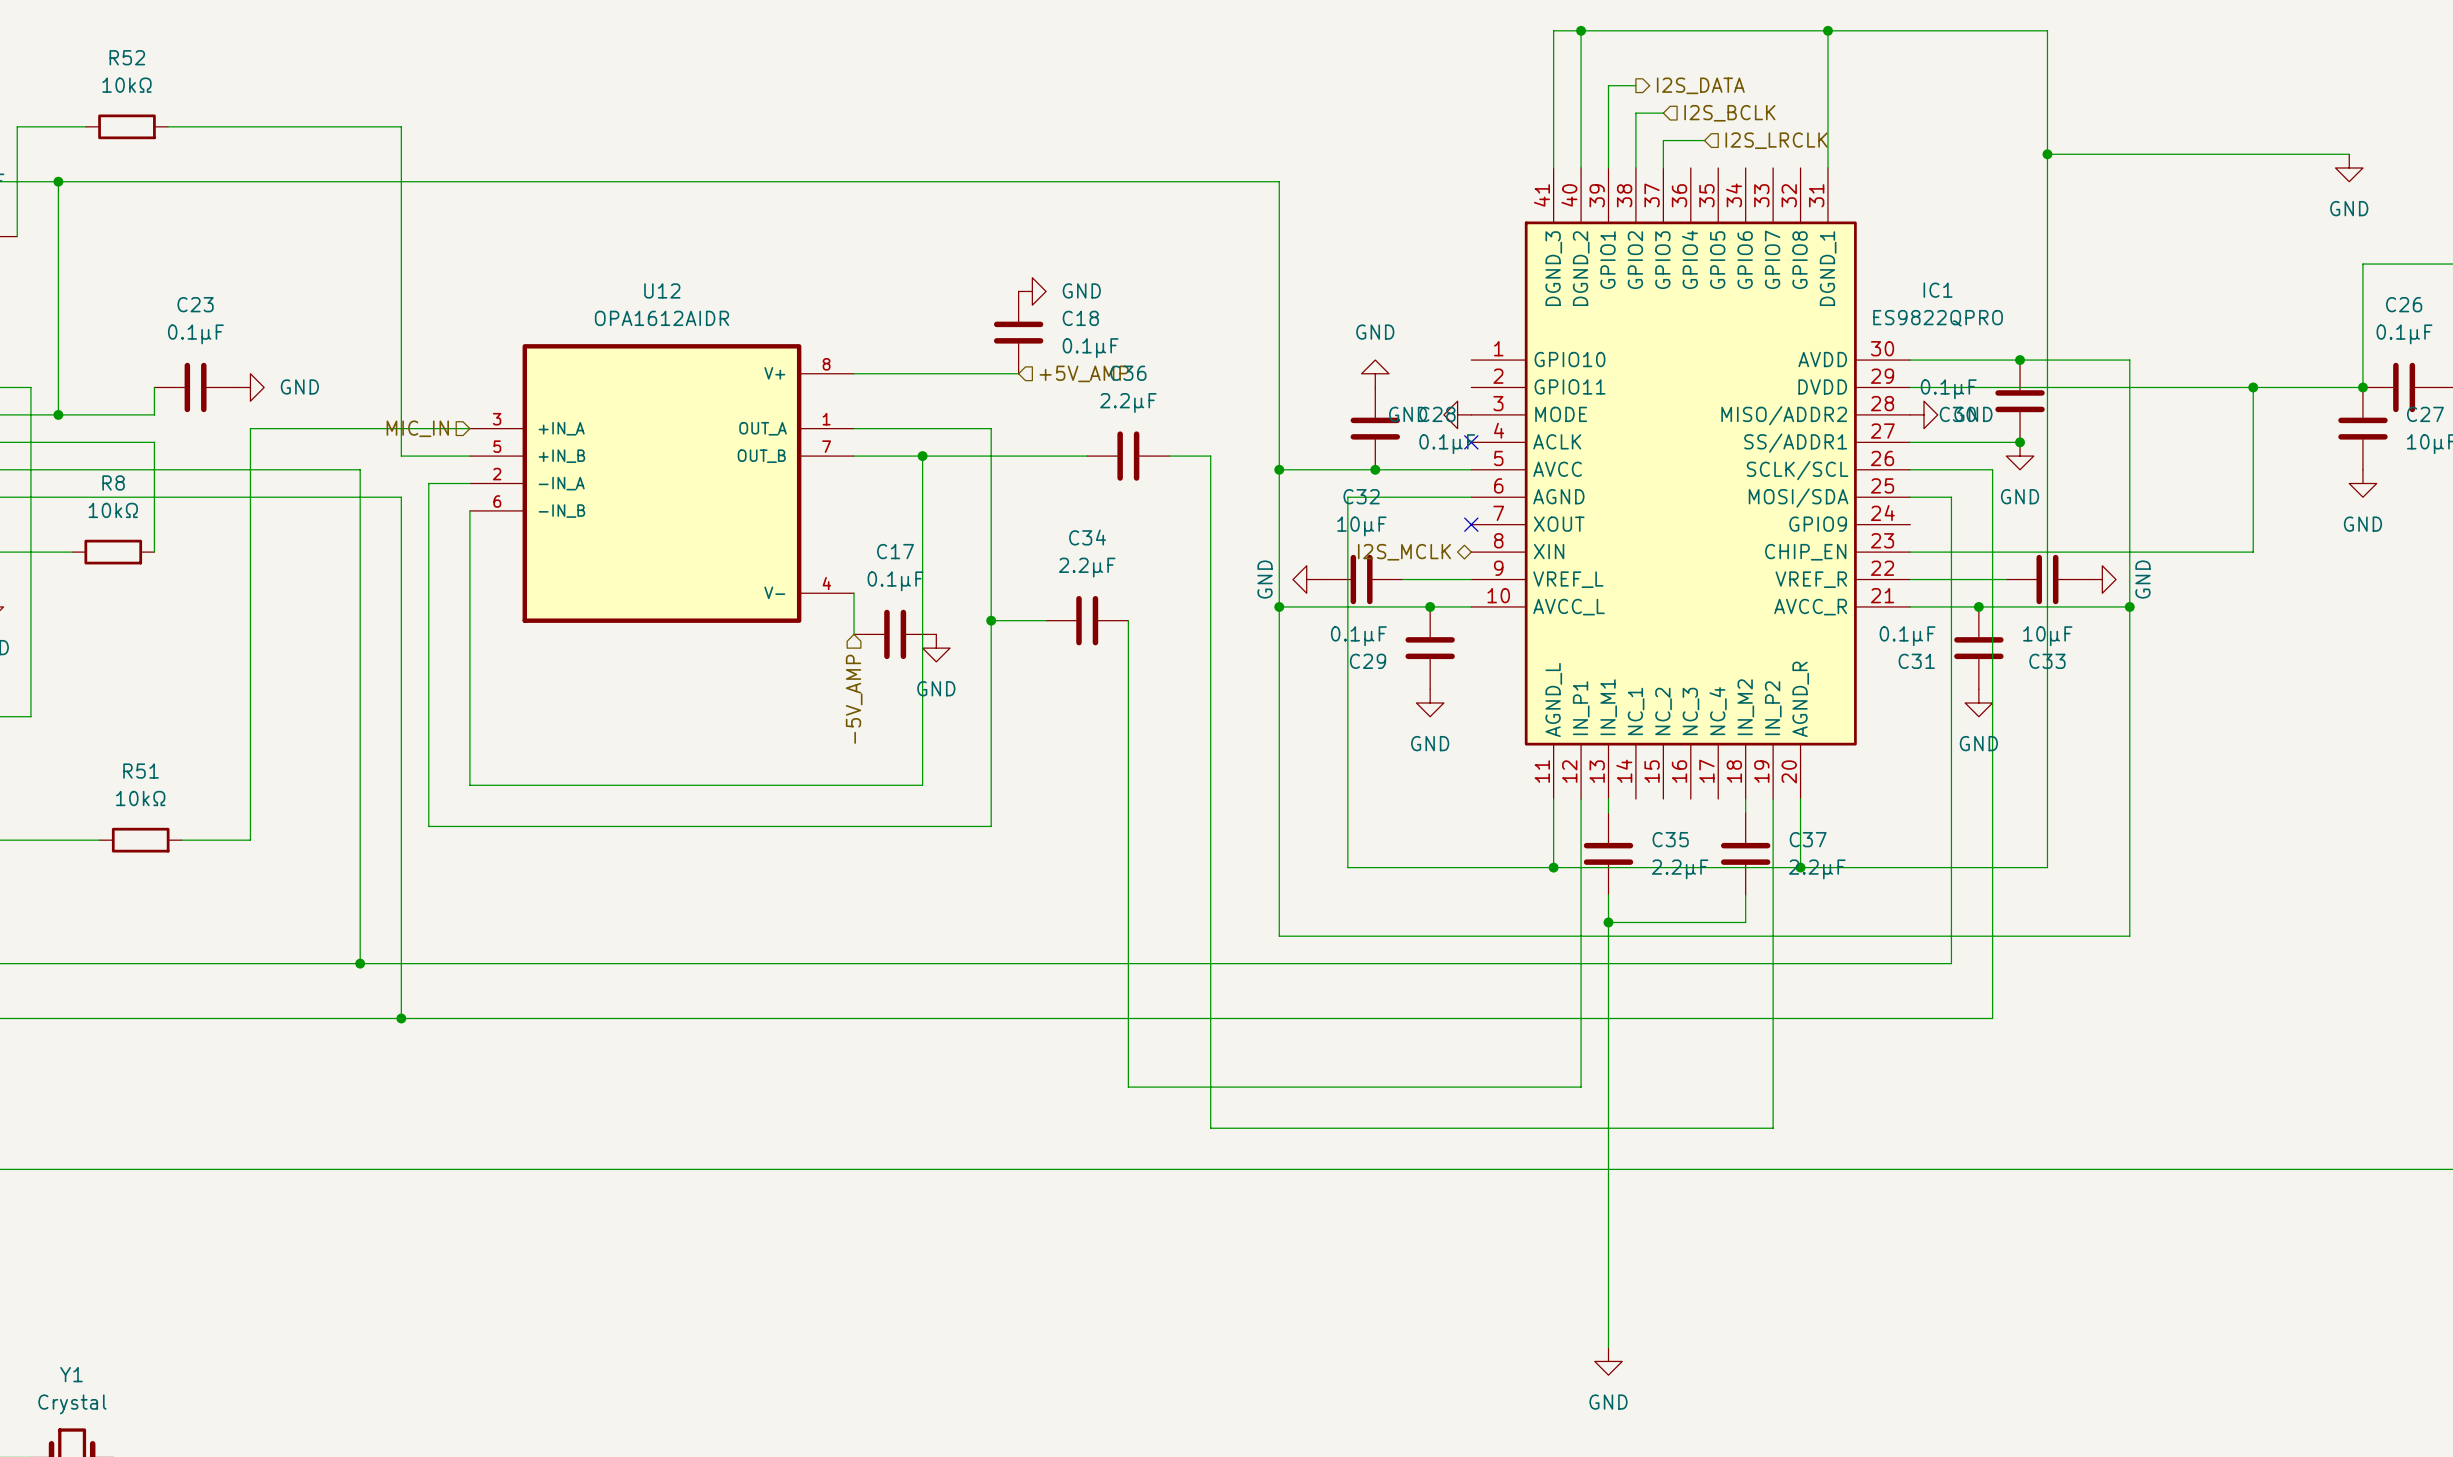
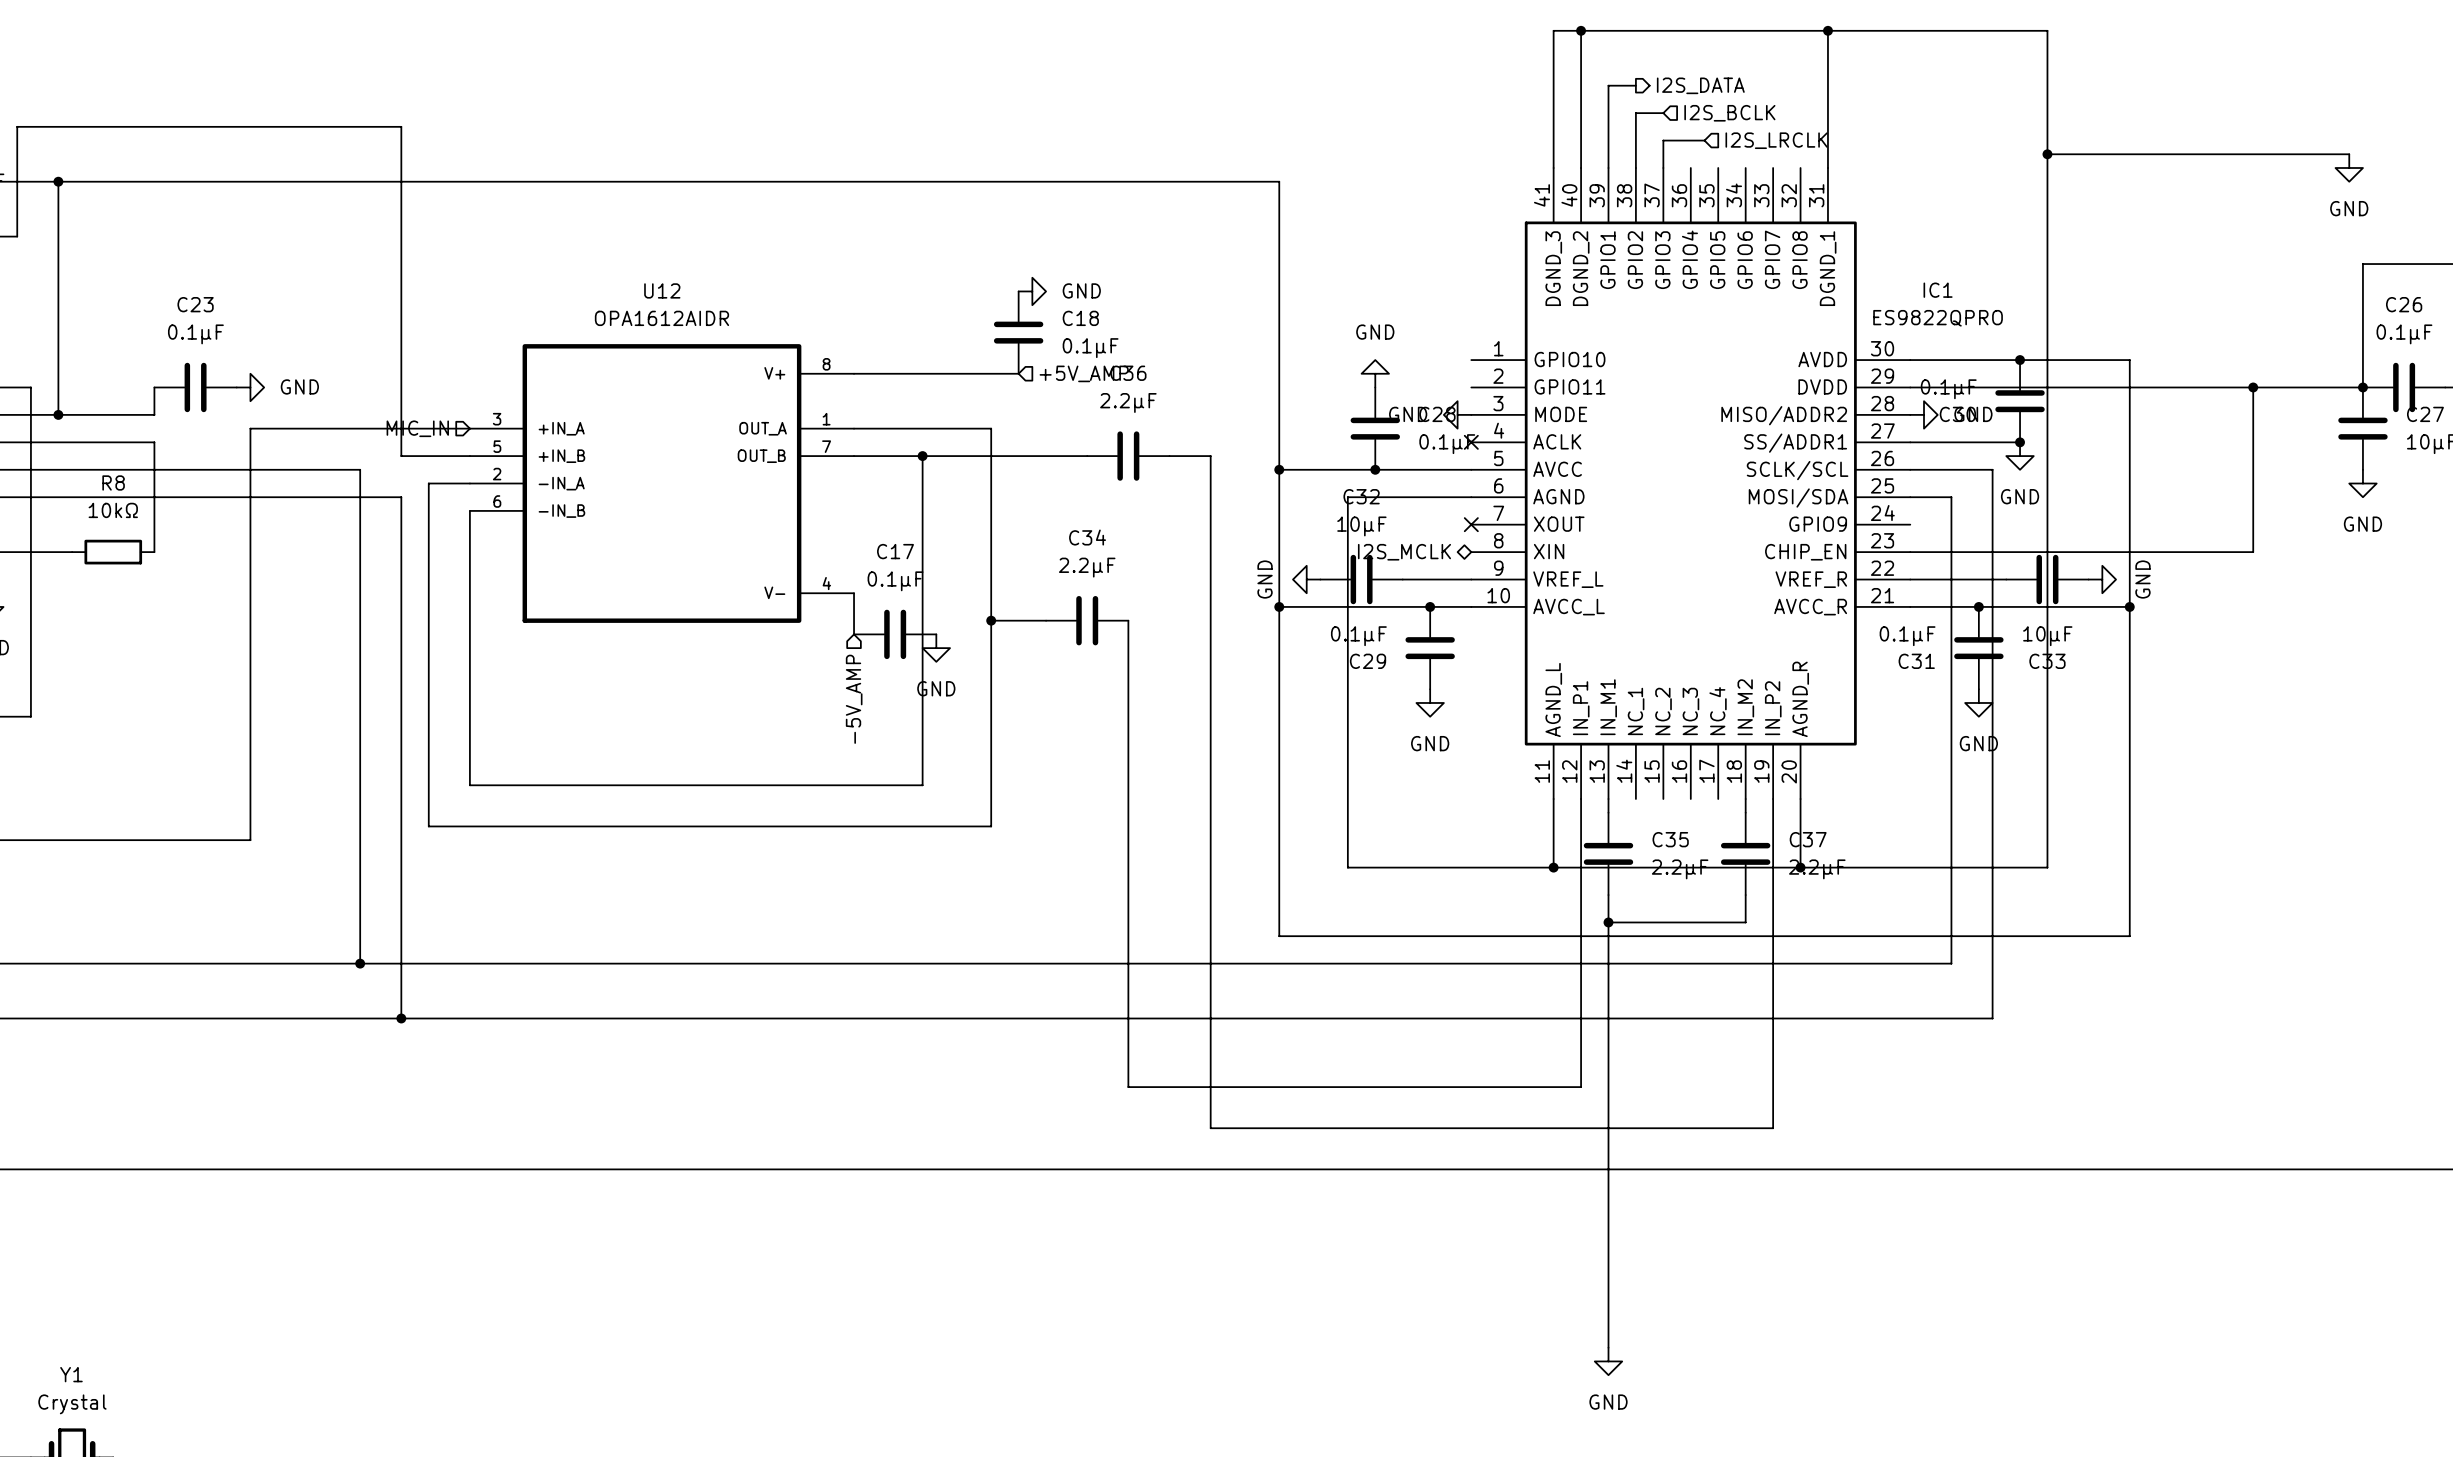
wire: none -> (85, 126) (168, 126)
R52: 10kΩ (126, 126) -> none
wire: none -> (99, 840) (181, 840)
R51: 10kΩ (140, 840) -> none

